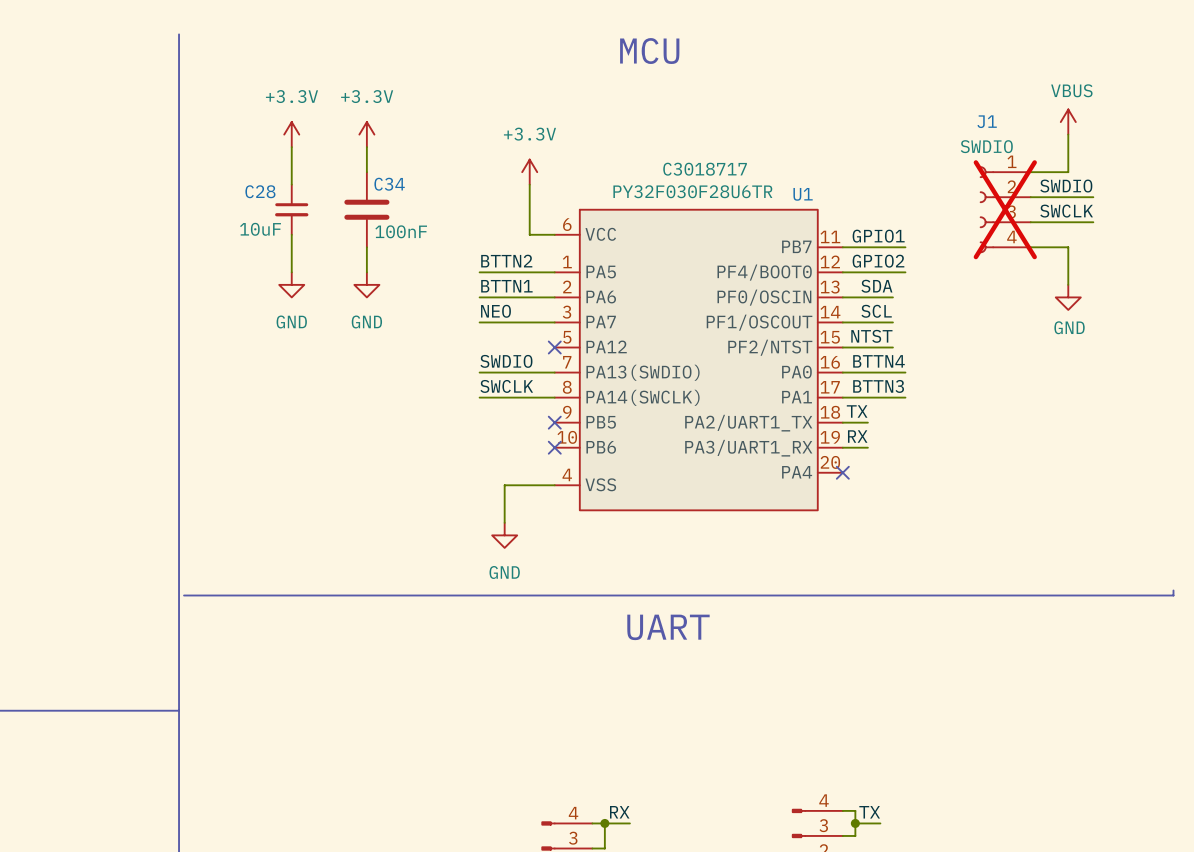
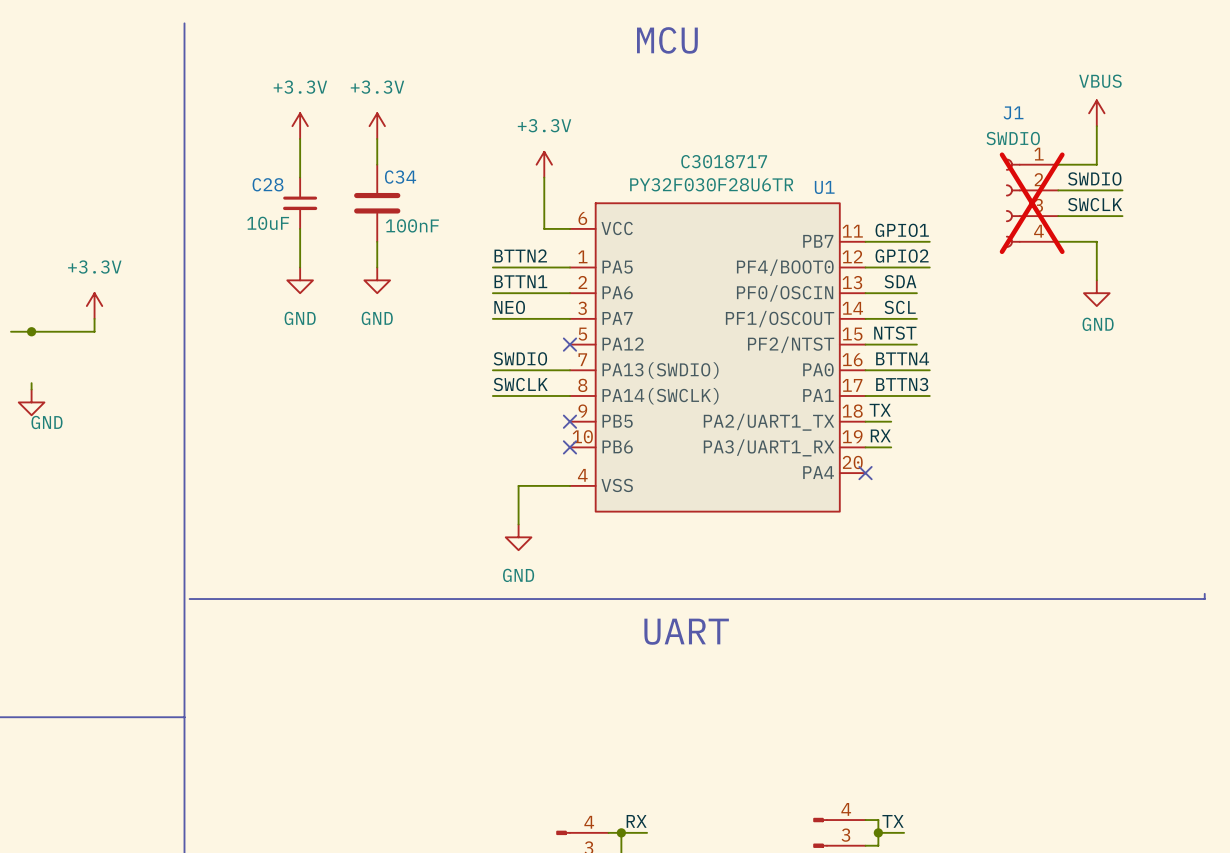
power symbol: none -> +3.3V (94, 306)
wire: none -> (94, 318) (94, 331) (11, 331)
junction: none -> (31, 331)
wire: none -> (31, 383) (31, 389)
power symbol: none -> GND (31, 402)

